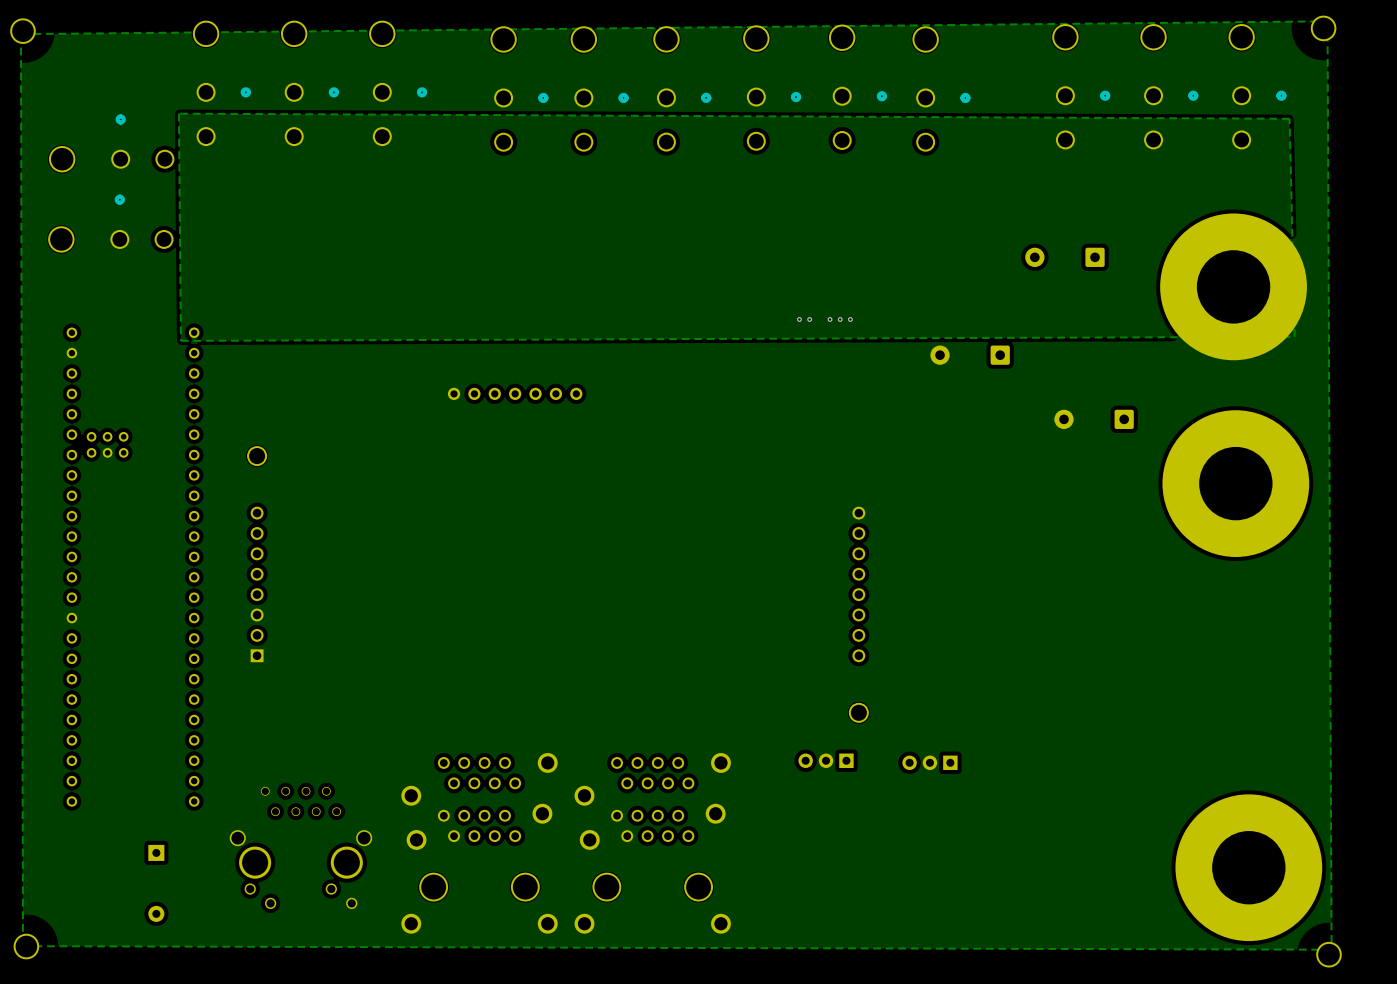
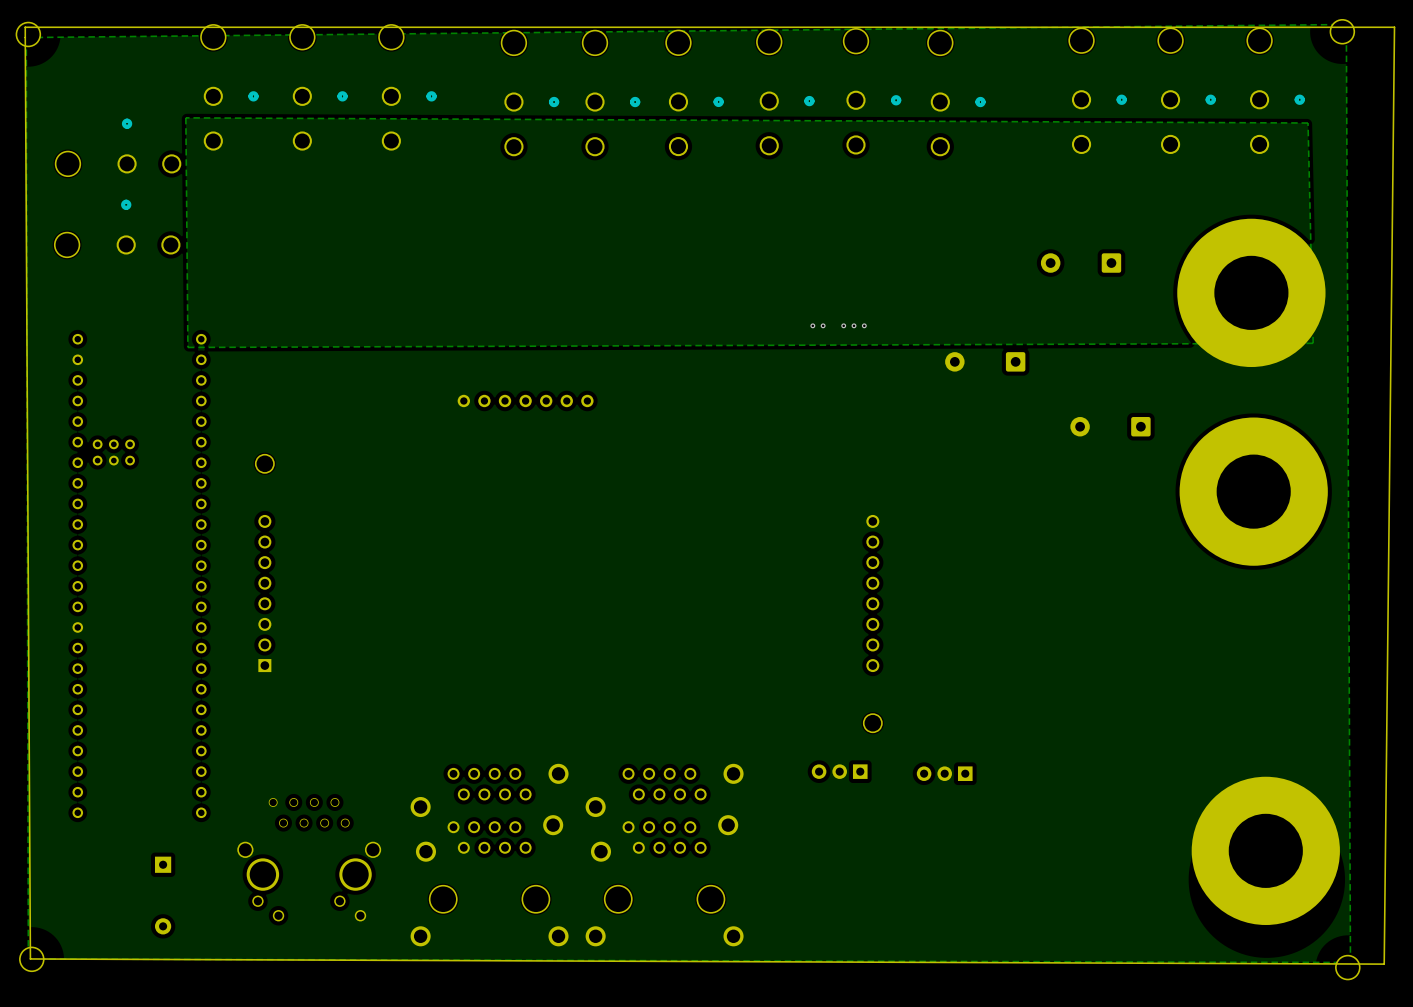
board edge: none -> (1394, 27) (25, 27) (30, 958) (1384, 964) (1394, 27)
part position: (1248, 867) -> (1265, 850)

